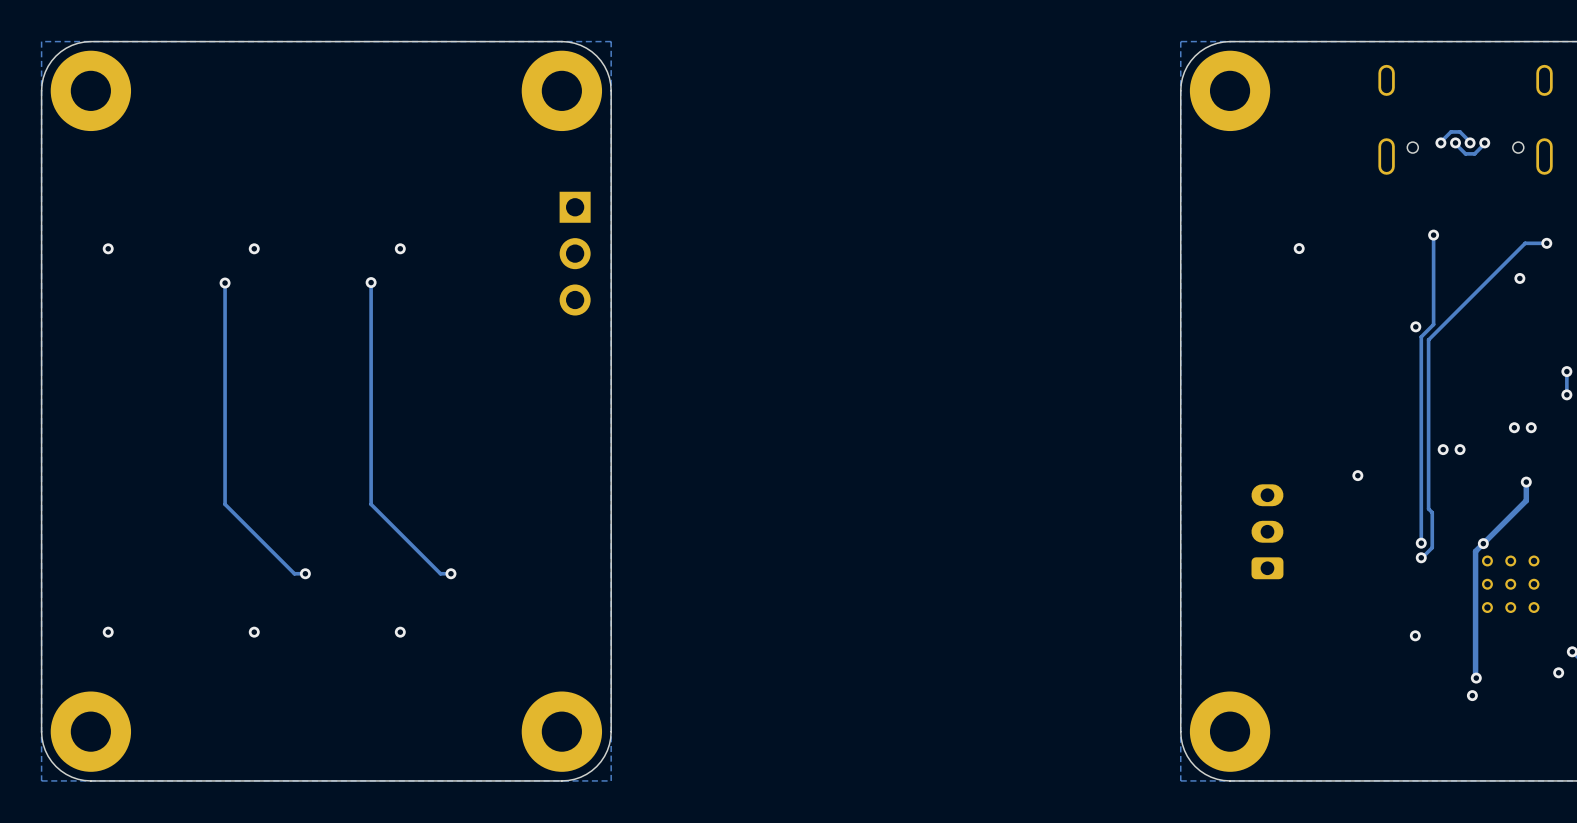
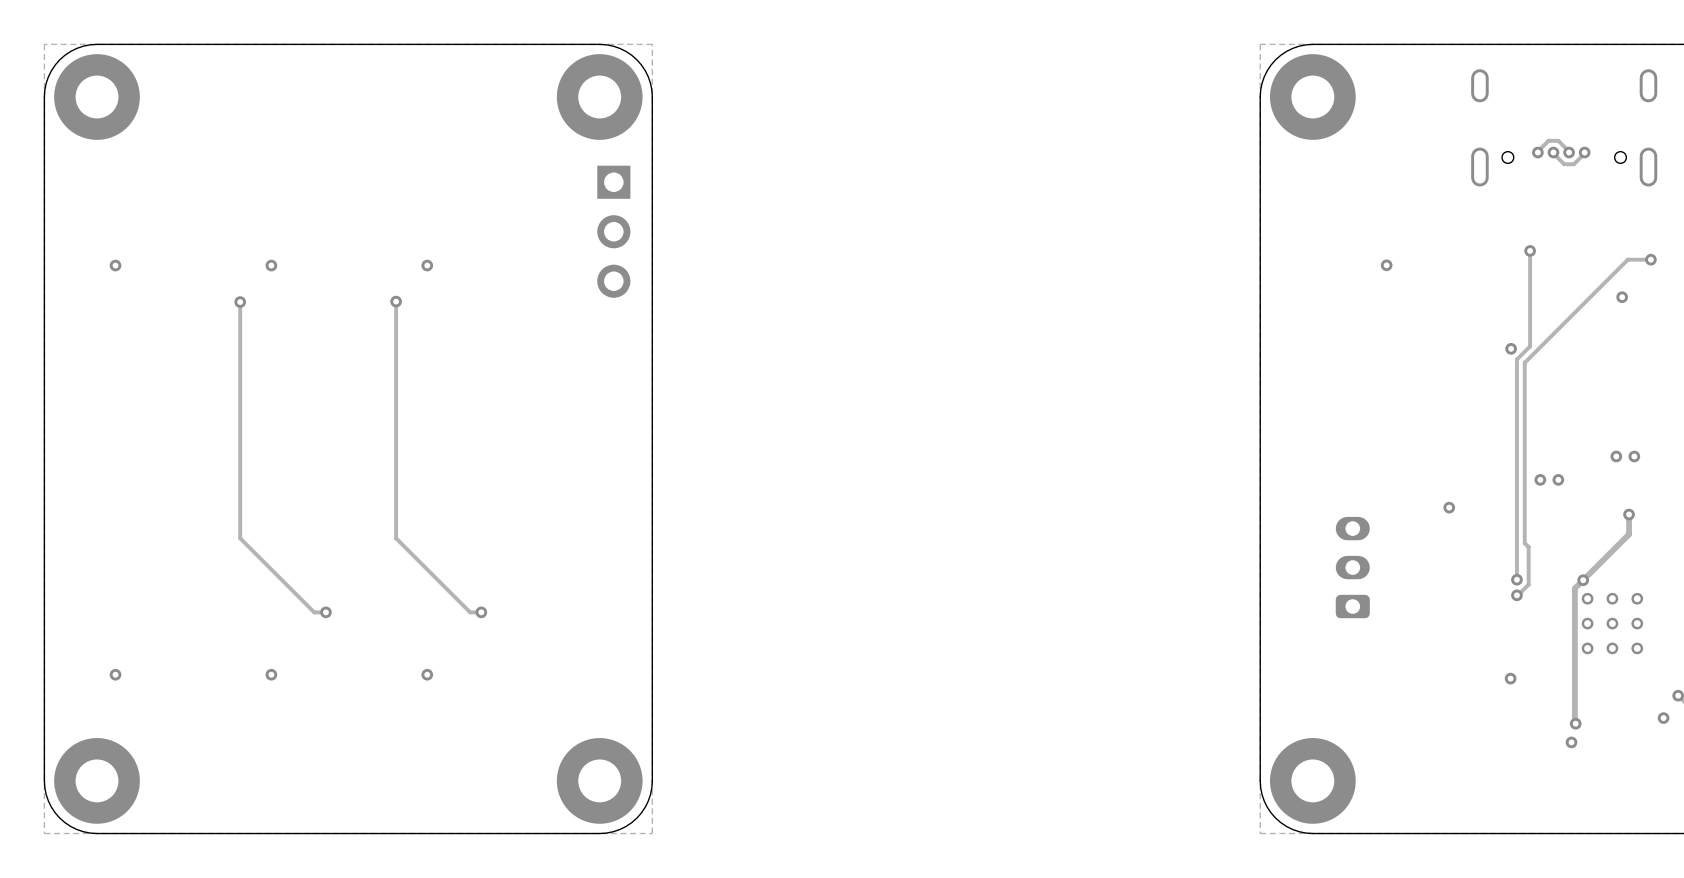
part position: (575, 253) -> (613, 231)
track: (1566, 371) (1566, 394) -> none
via: (1566, 371) -> none
via: (1566, 394) -> none

